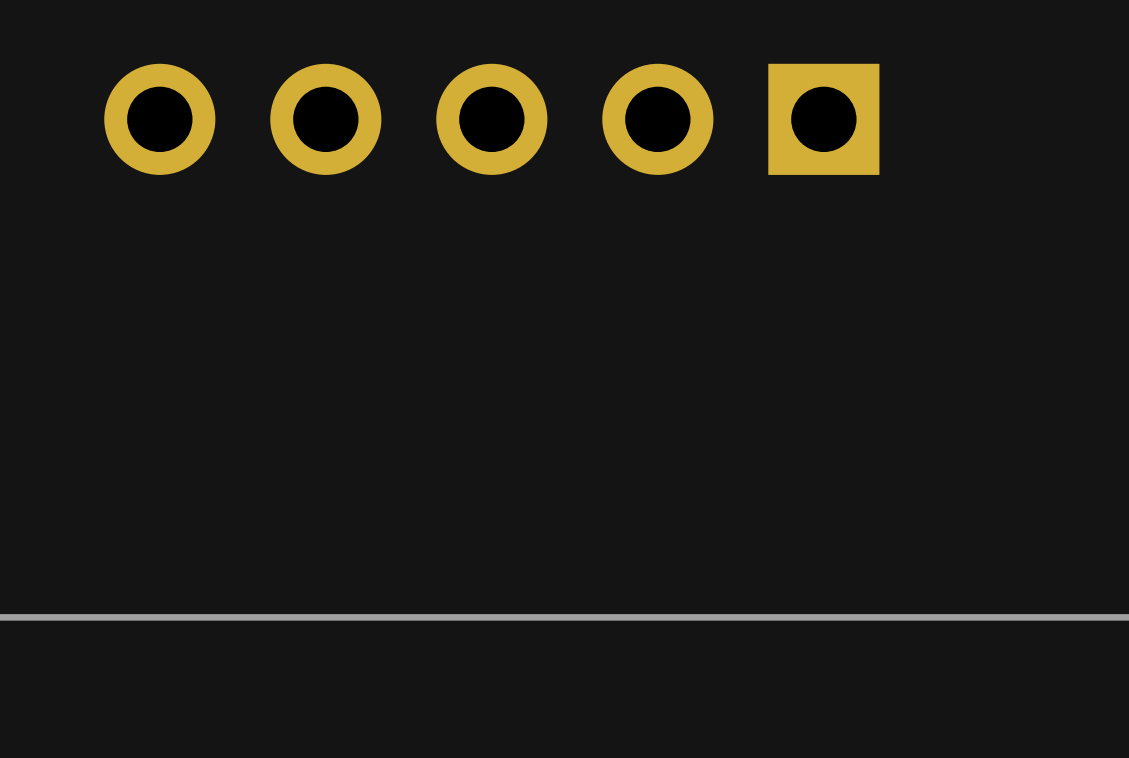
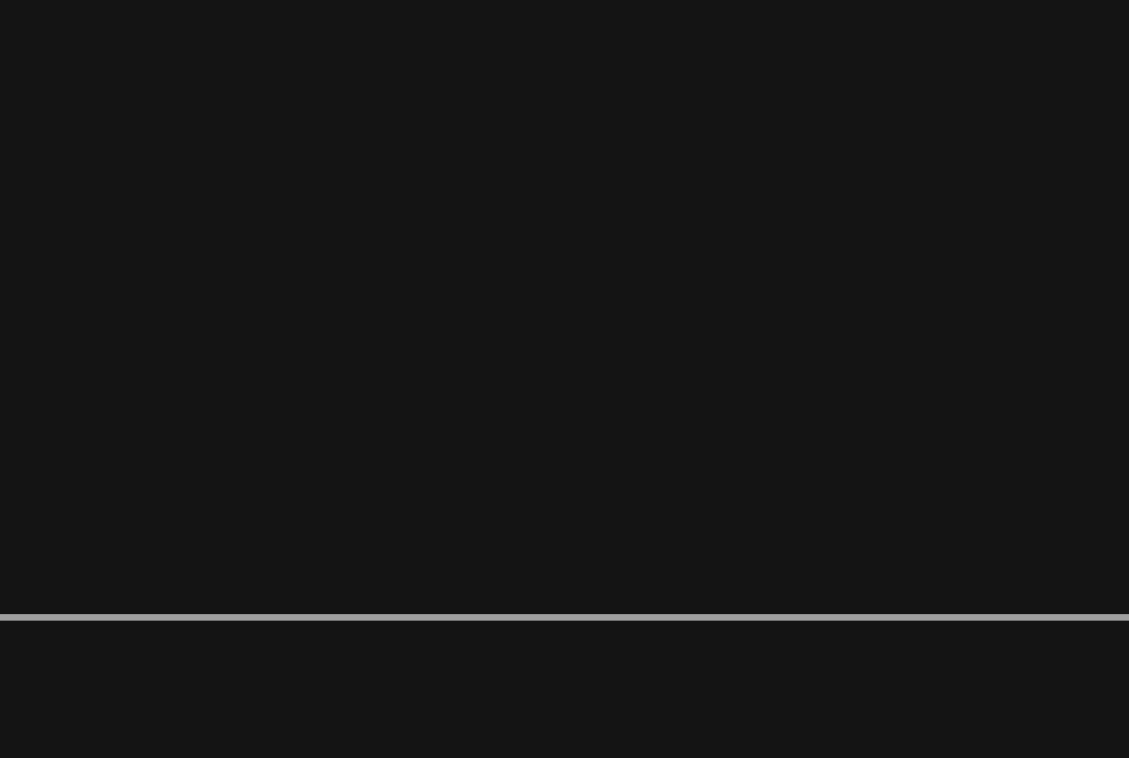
part: (491, 119) -> none

